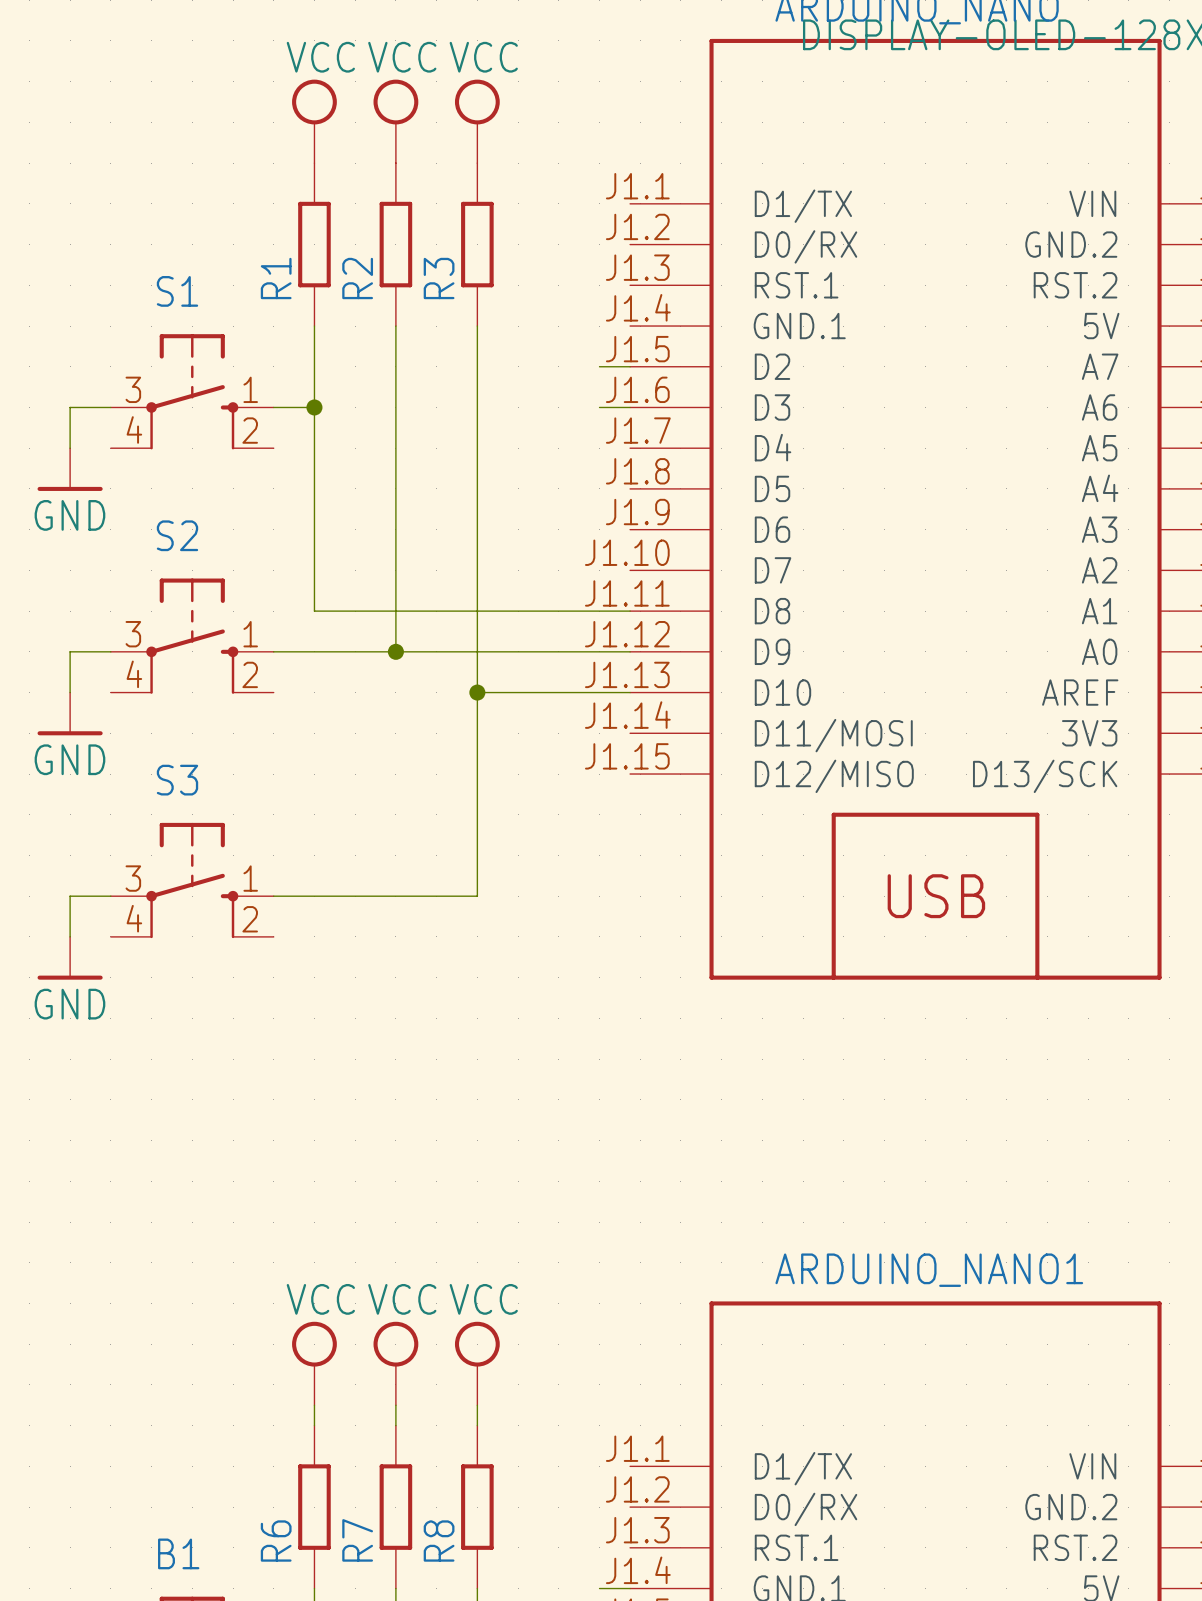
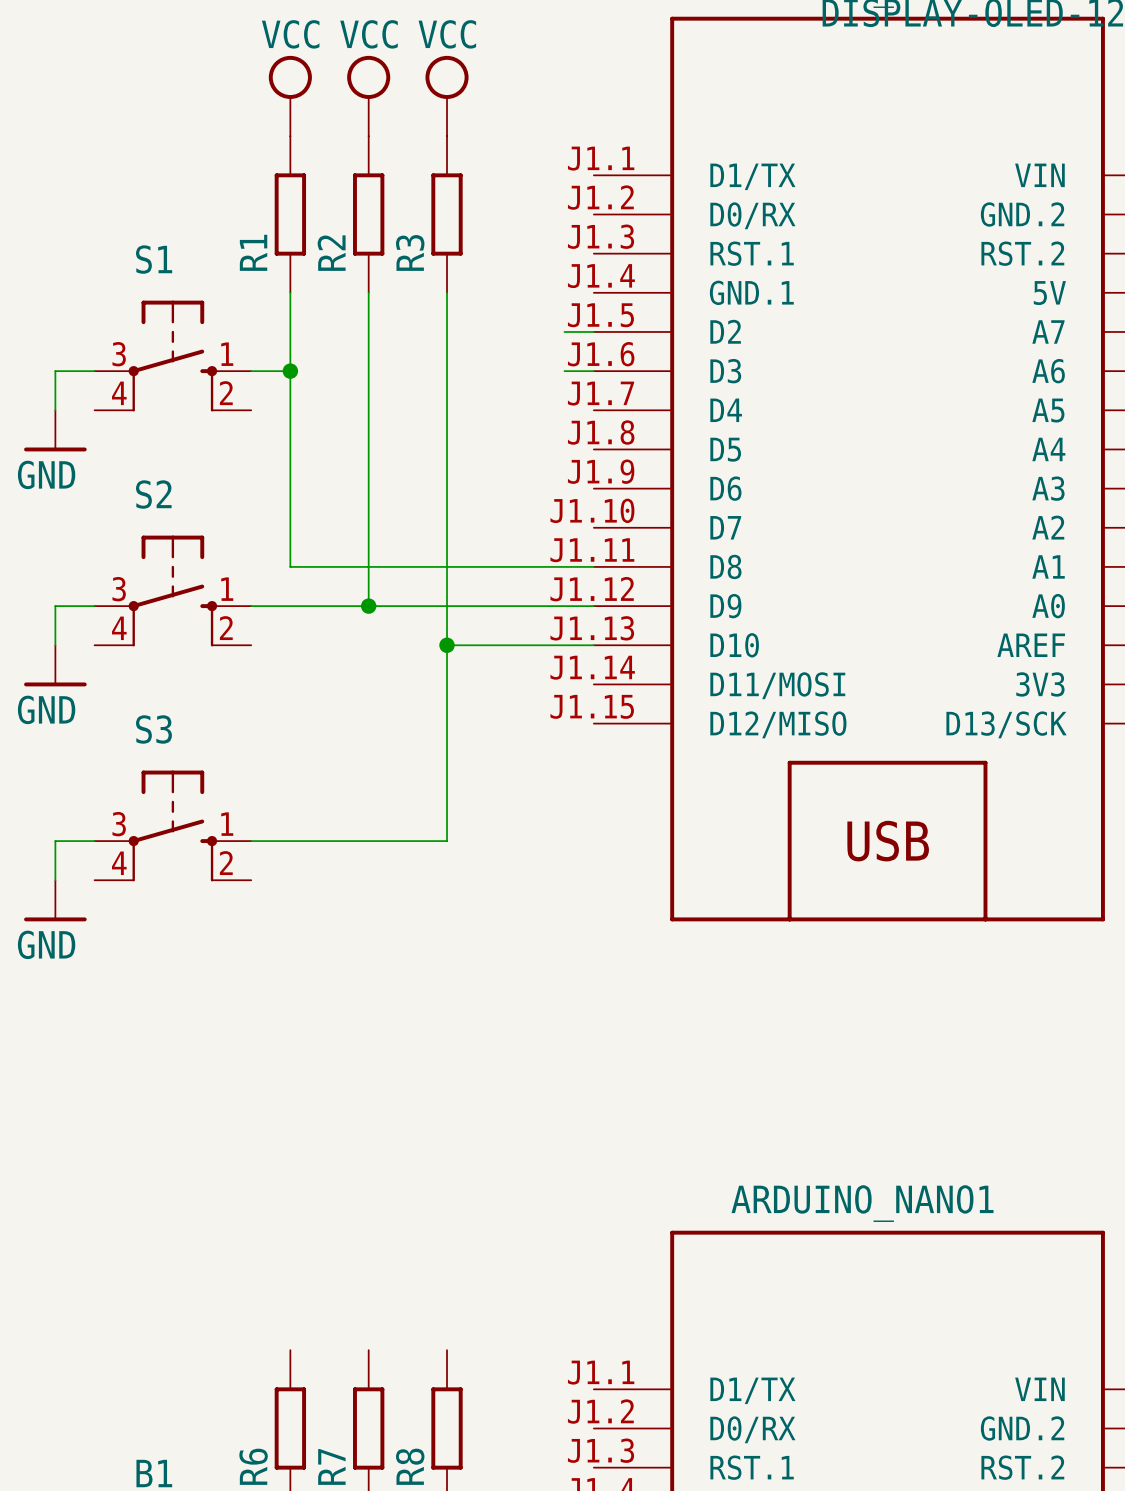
power symbol: VCC (314, 1363) -> none
power symbol: VCC (395, 1363) -> none
power symbol: VCC (477, 1363) -> none
wire: (314, 1405) (314, 1425) -> none
wire: (395, 1405) (395, 1425) -> none
wire: (477, 1405) (477, 1425) -> none

